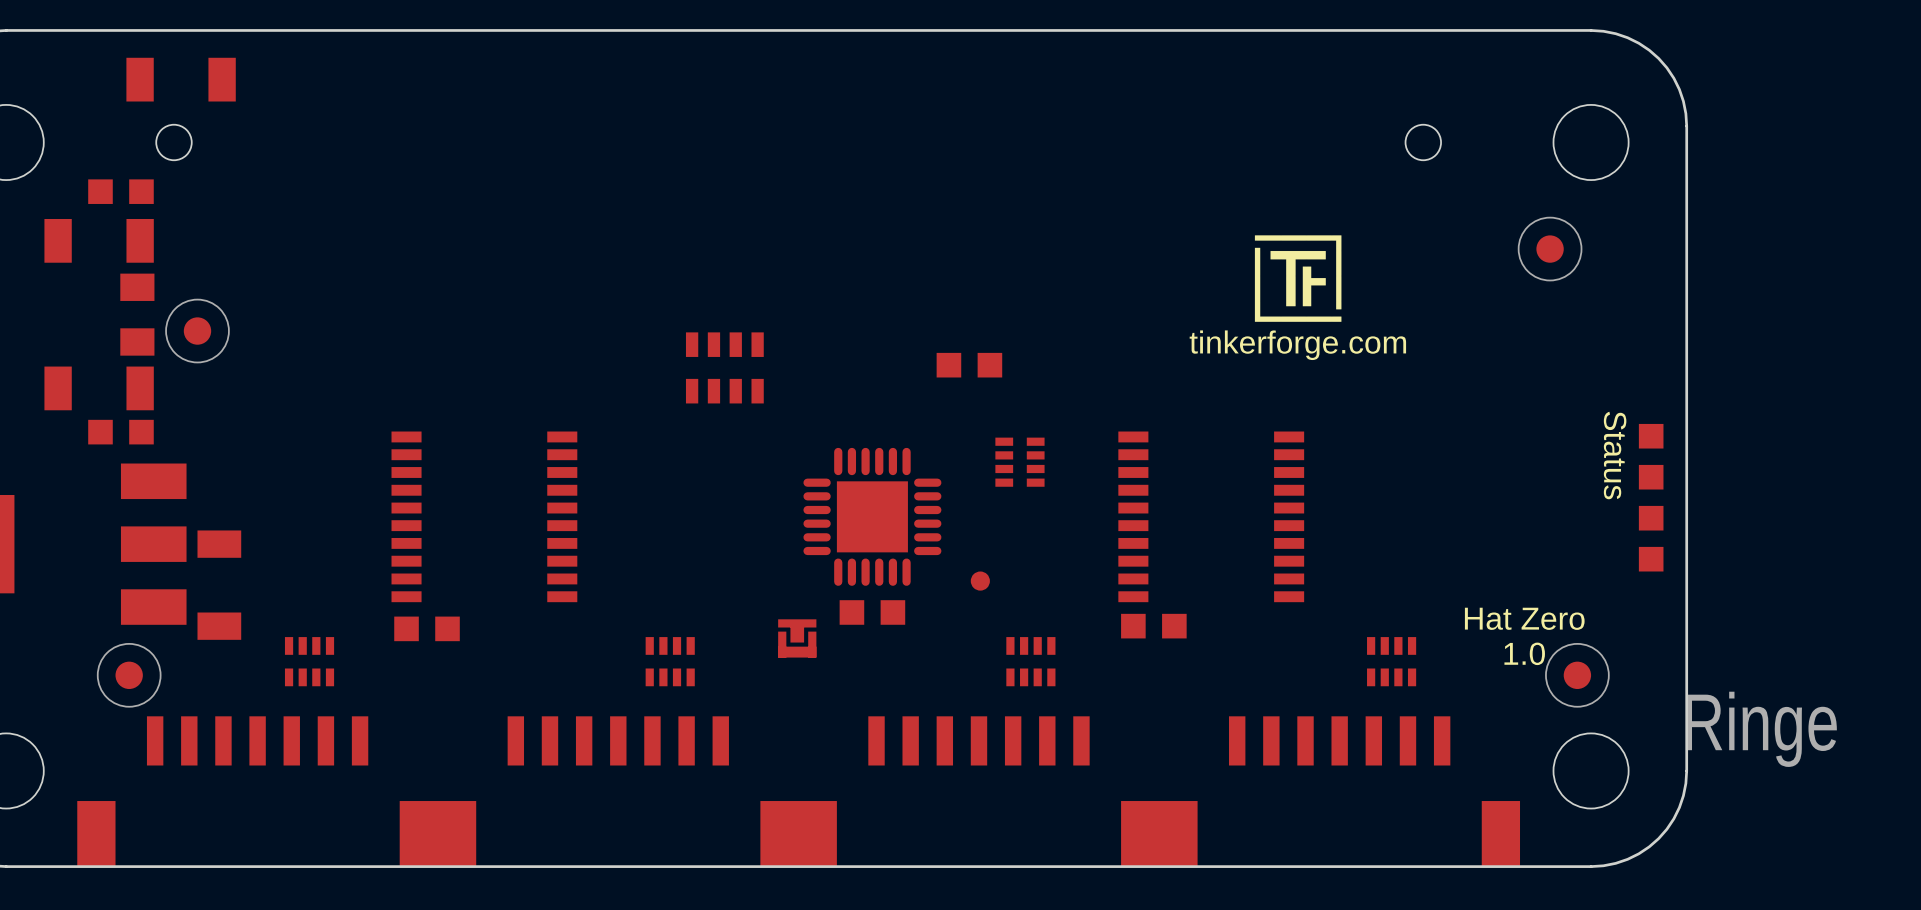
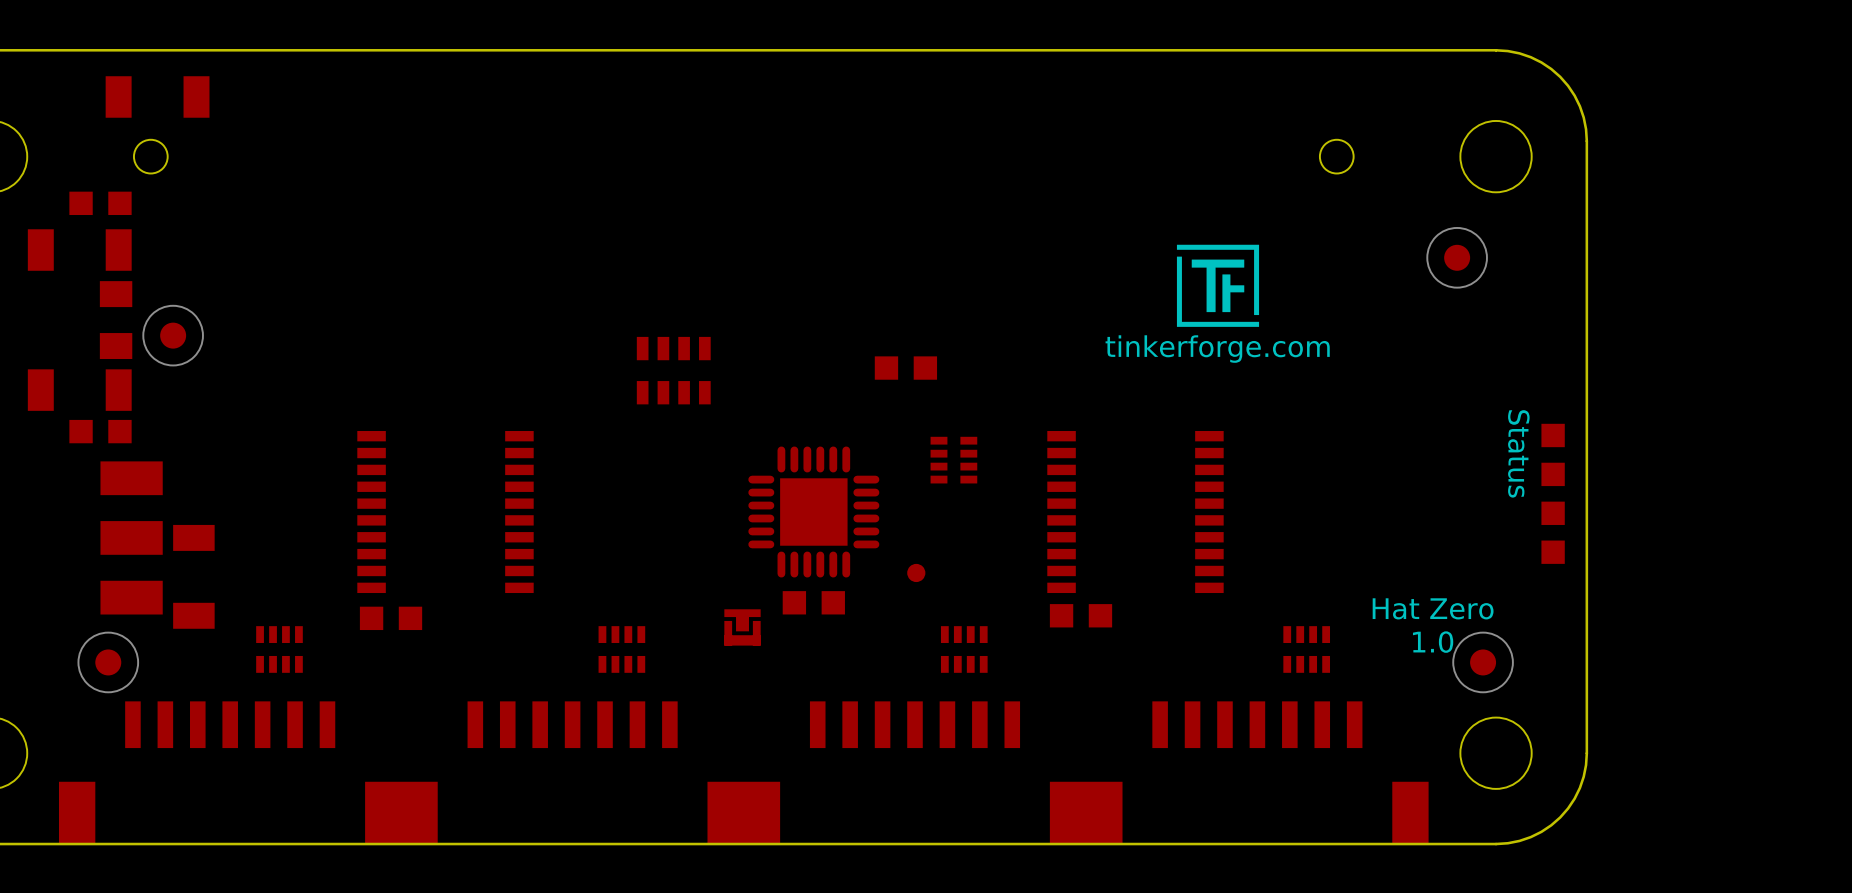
text: Ringe (1761, 729) -> none

